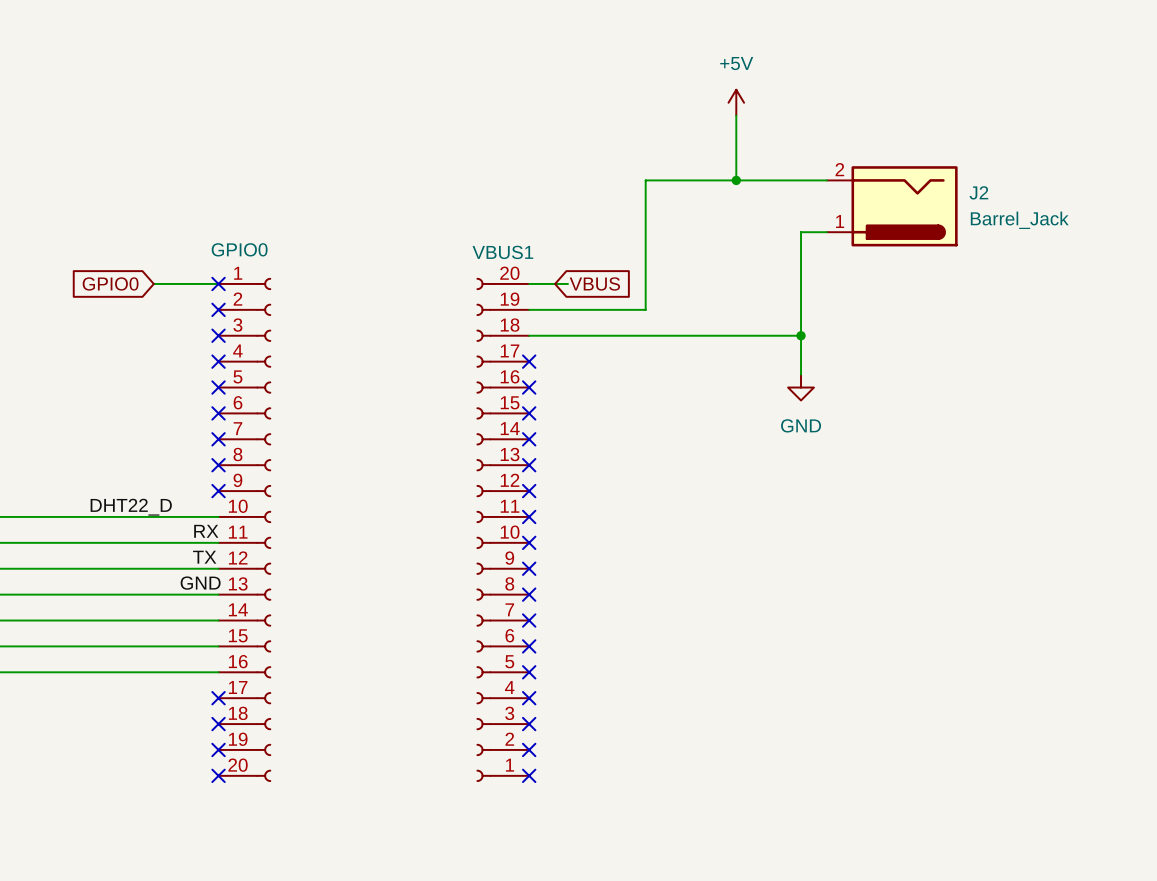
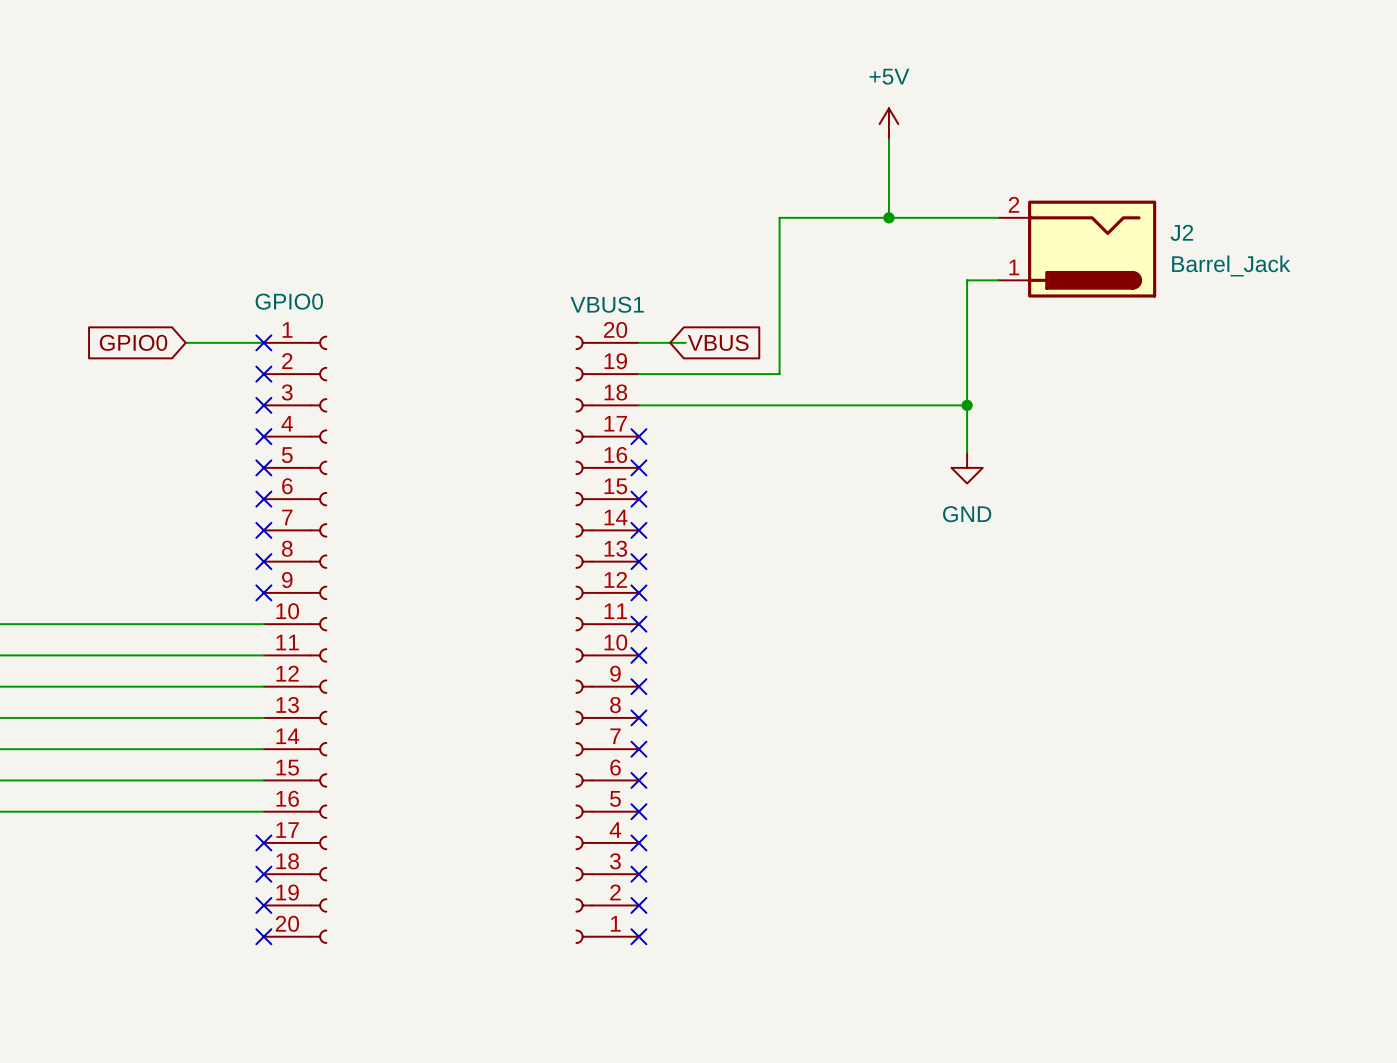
label: DHT22_D (131, 507) -> none
label: RX (206, 531) -> none
label: TX (204, 557) -> none
label: GND (200, 583) -> none

